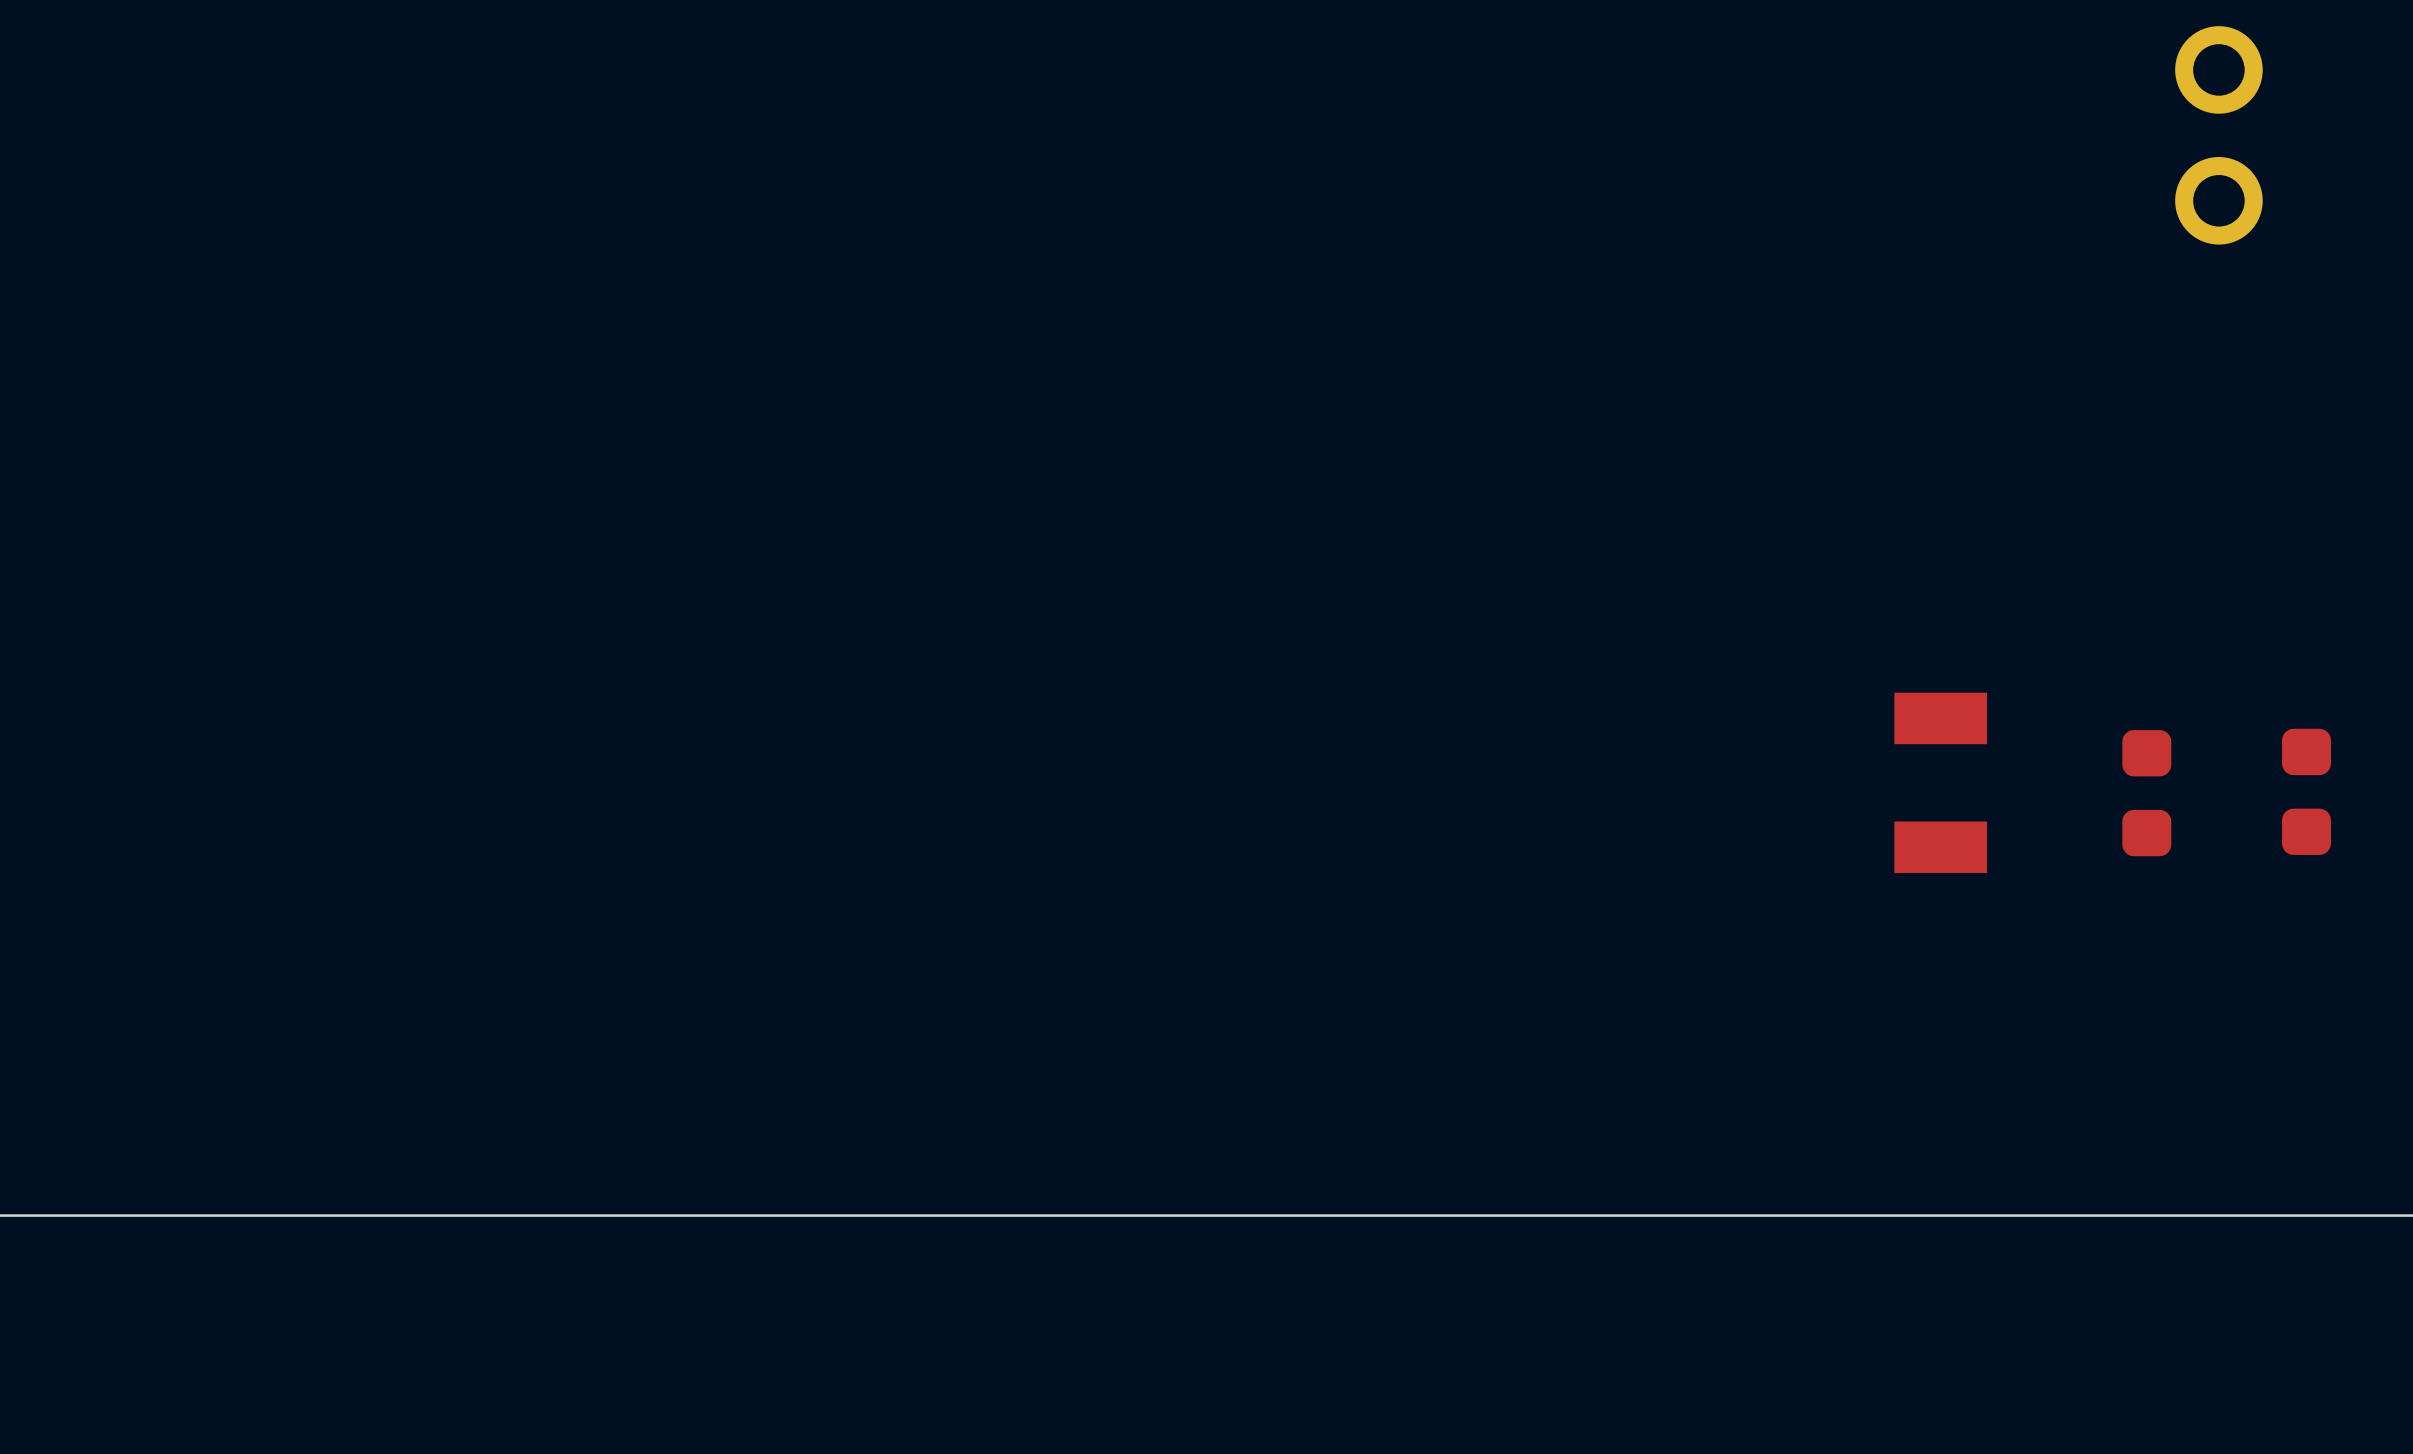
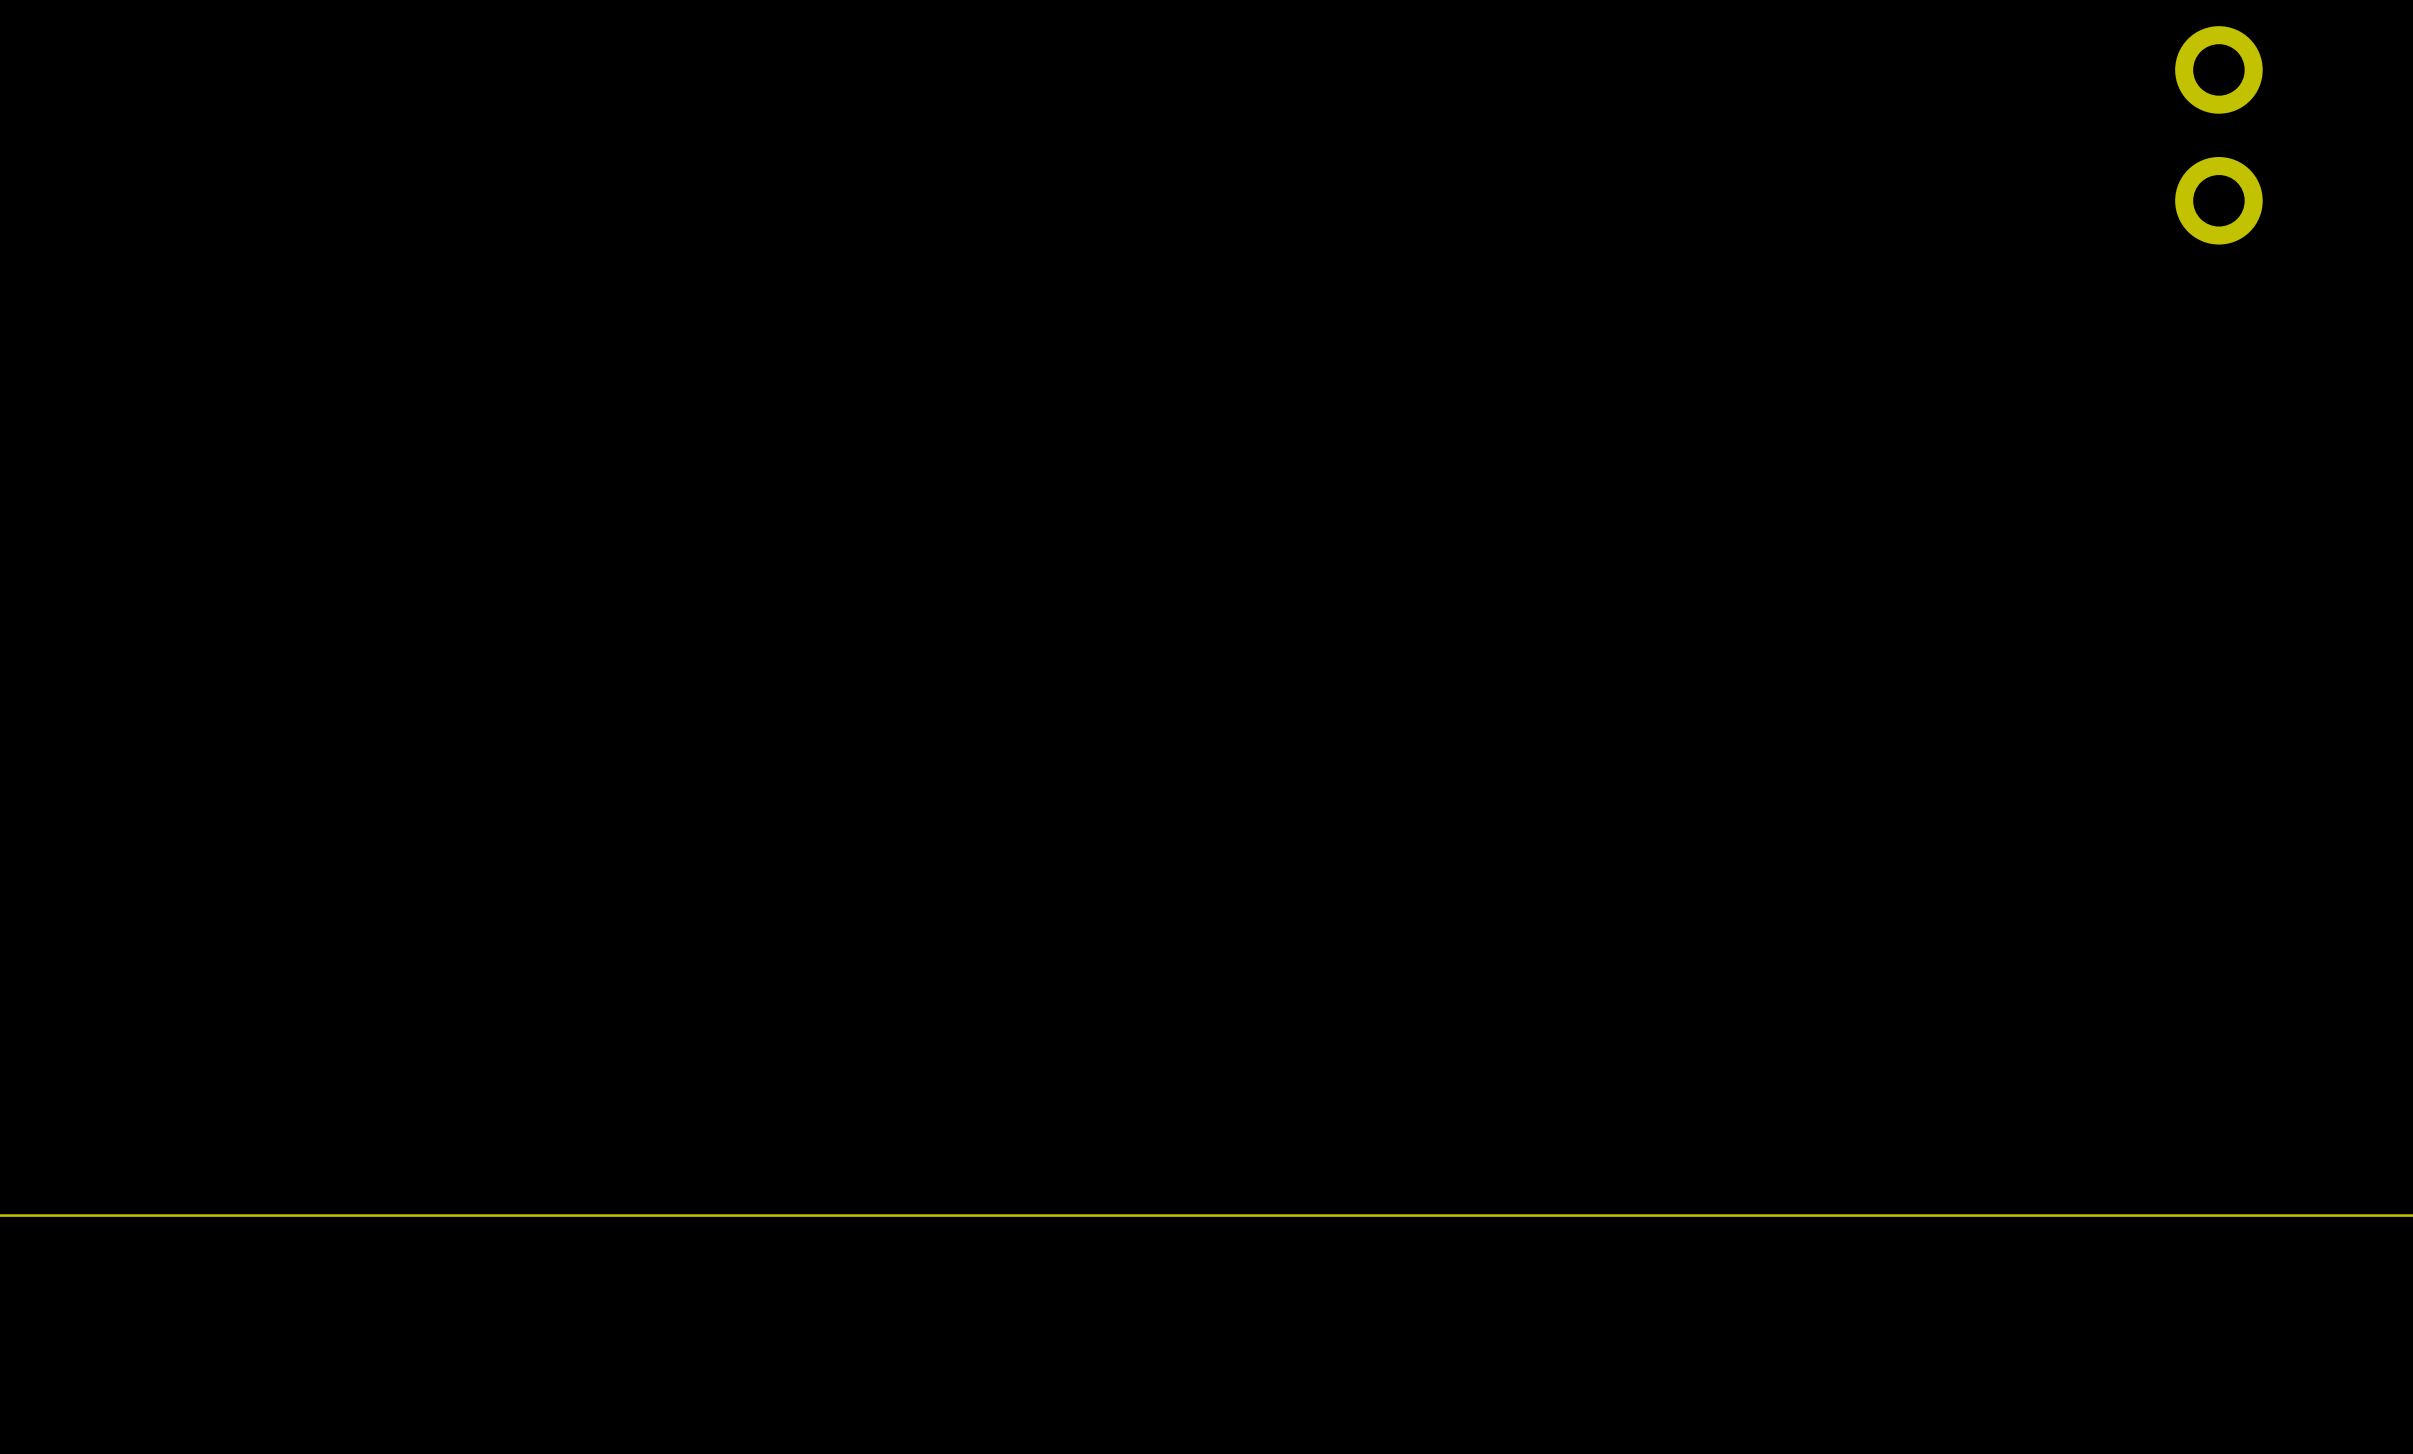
part: (1940, 782) -> none
part: (2306, 791) -> none
part: (2146, 793) -> none

